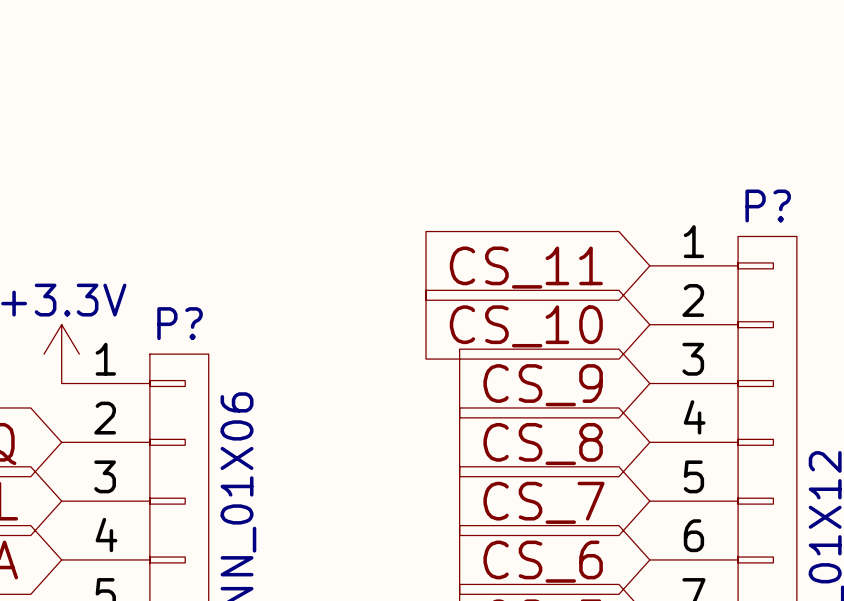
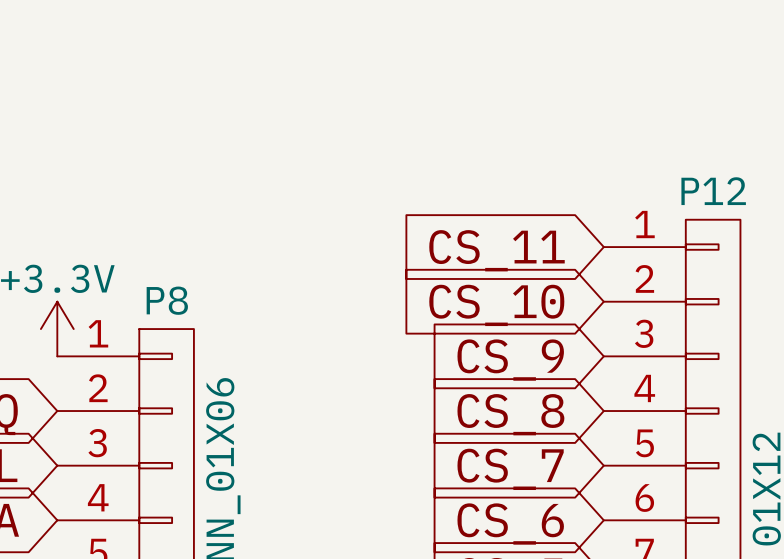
P? name: P? (768, 205) -> P12 (713, 191)
P? name: P? (180, 323) -> P8 (167, 300)

